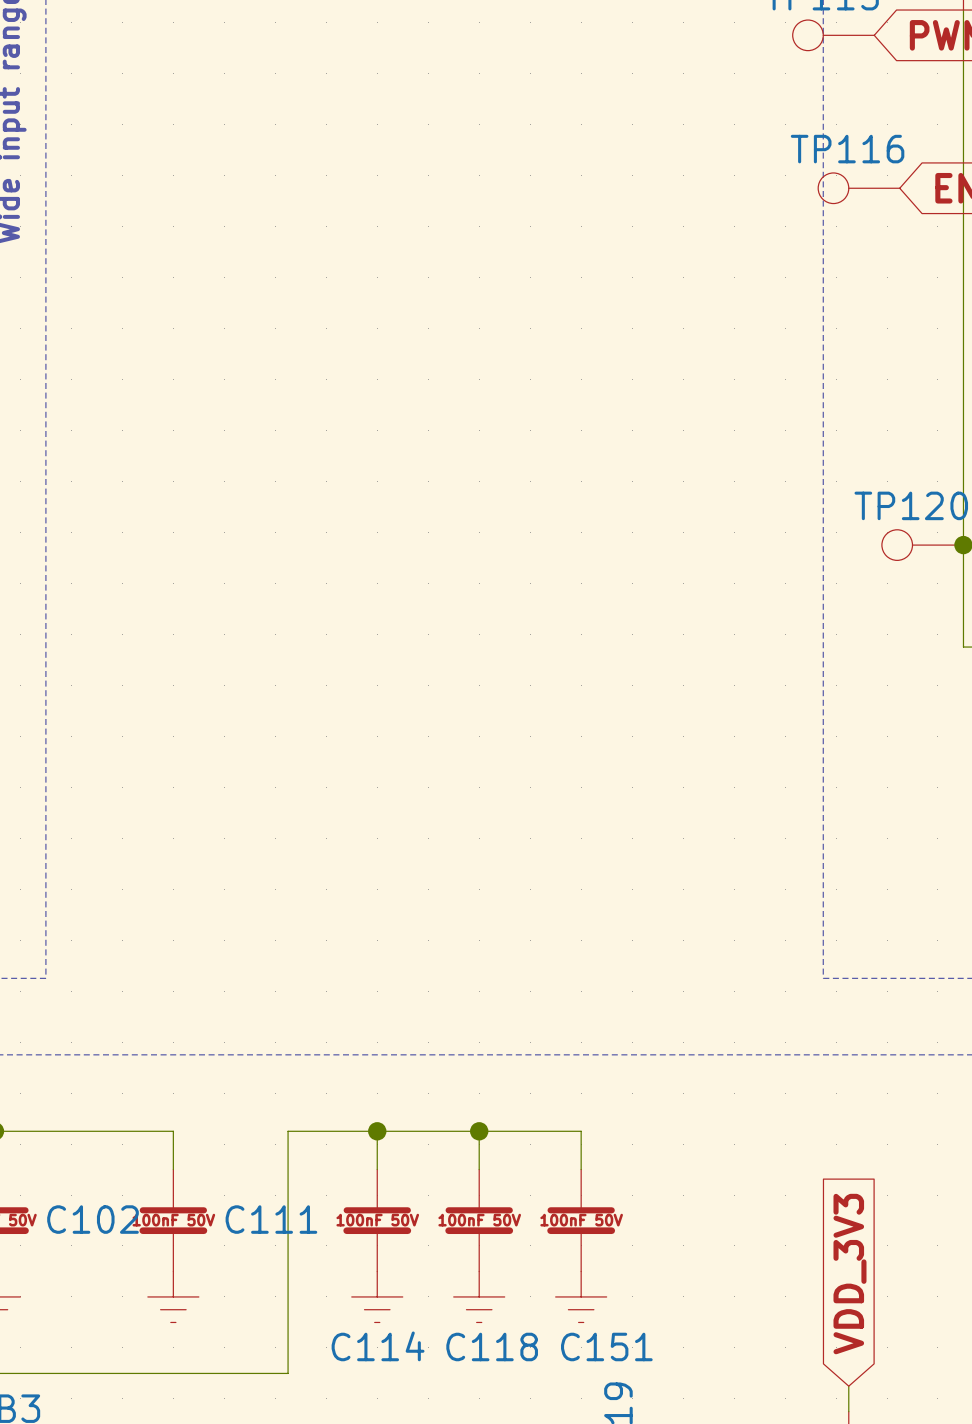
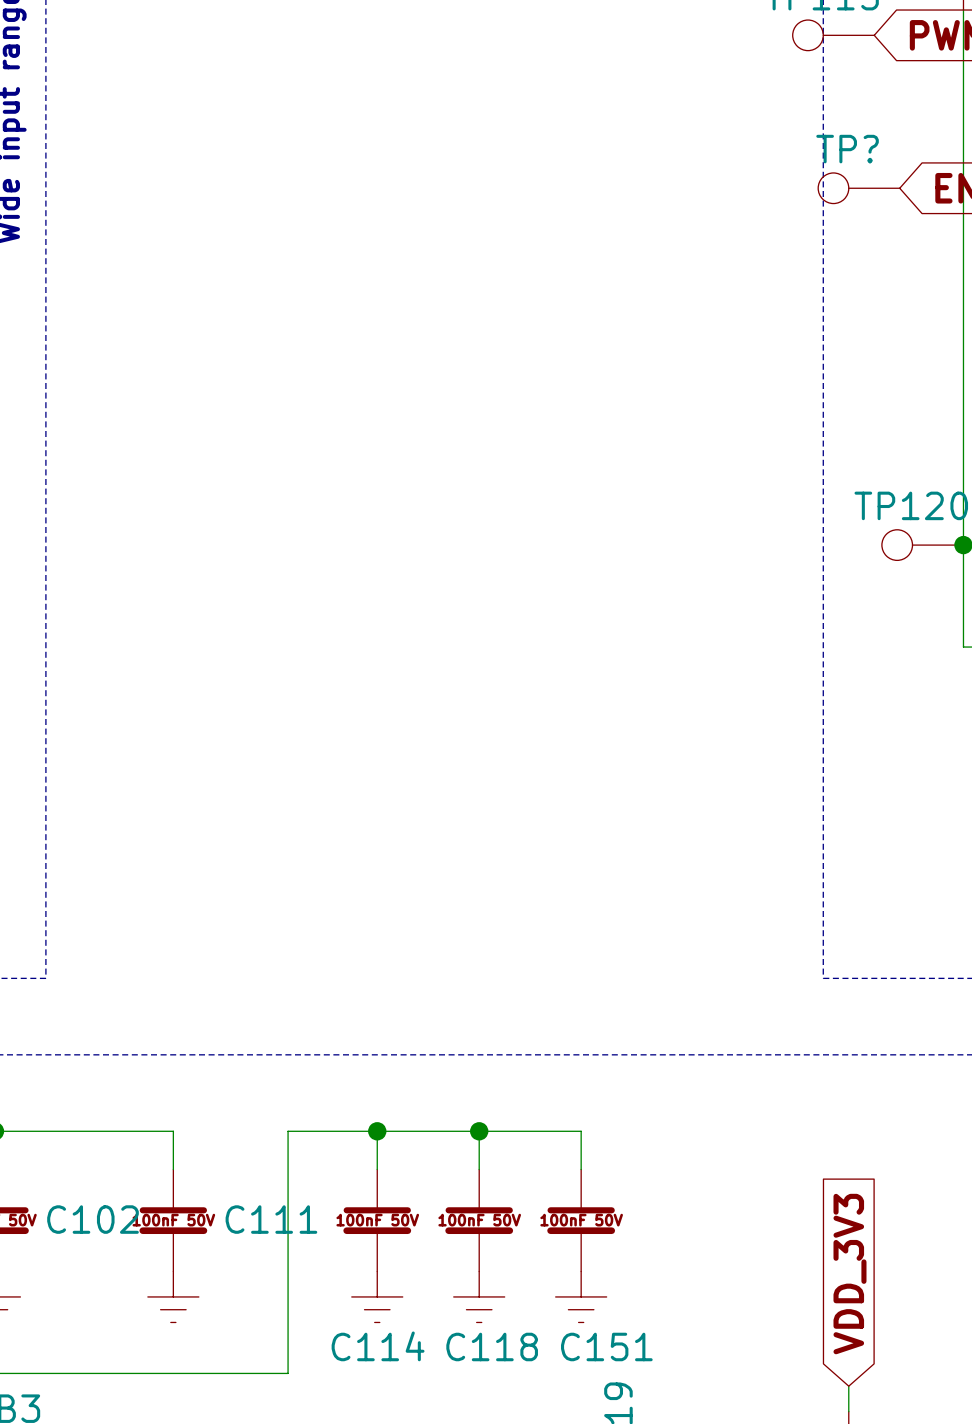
TP116 name: TP116 (847, 149) -> TP? (847, 149)

